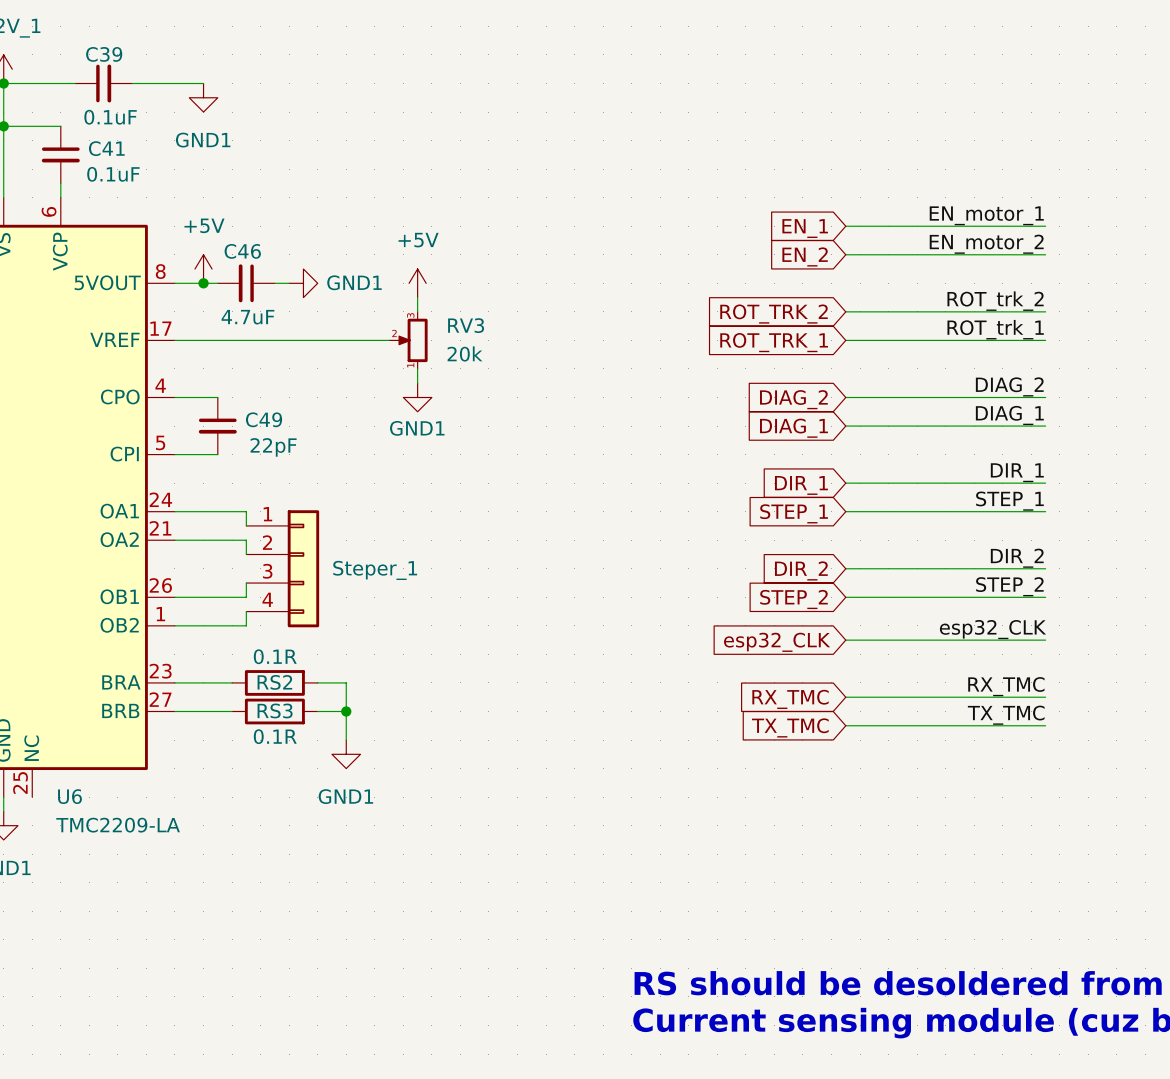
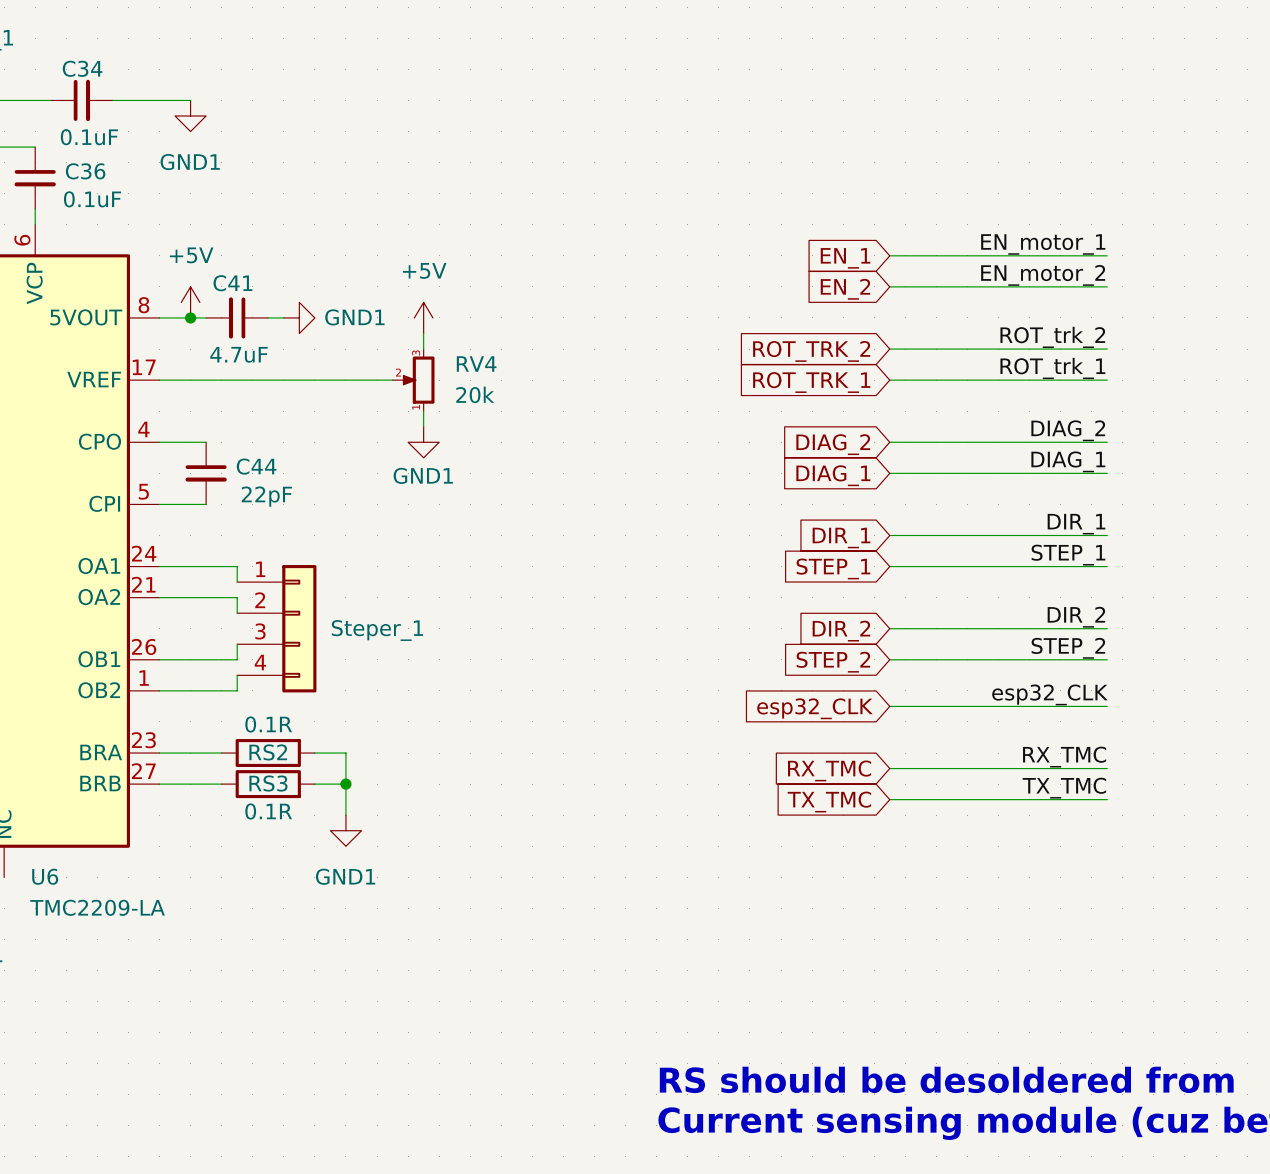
C39 name: C39 (104, 54) -> C34 (82, 68)
C41 name: C41 (106, 148) -> C36 (85, 171)
C46 name: C46 (242, 251) -> C41 (232, 283)
RV3 name: RV3 (466, 325) -> RV4 (476, 364)
C49 name: C49 (264, 419) -> C44 (256, 466)

